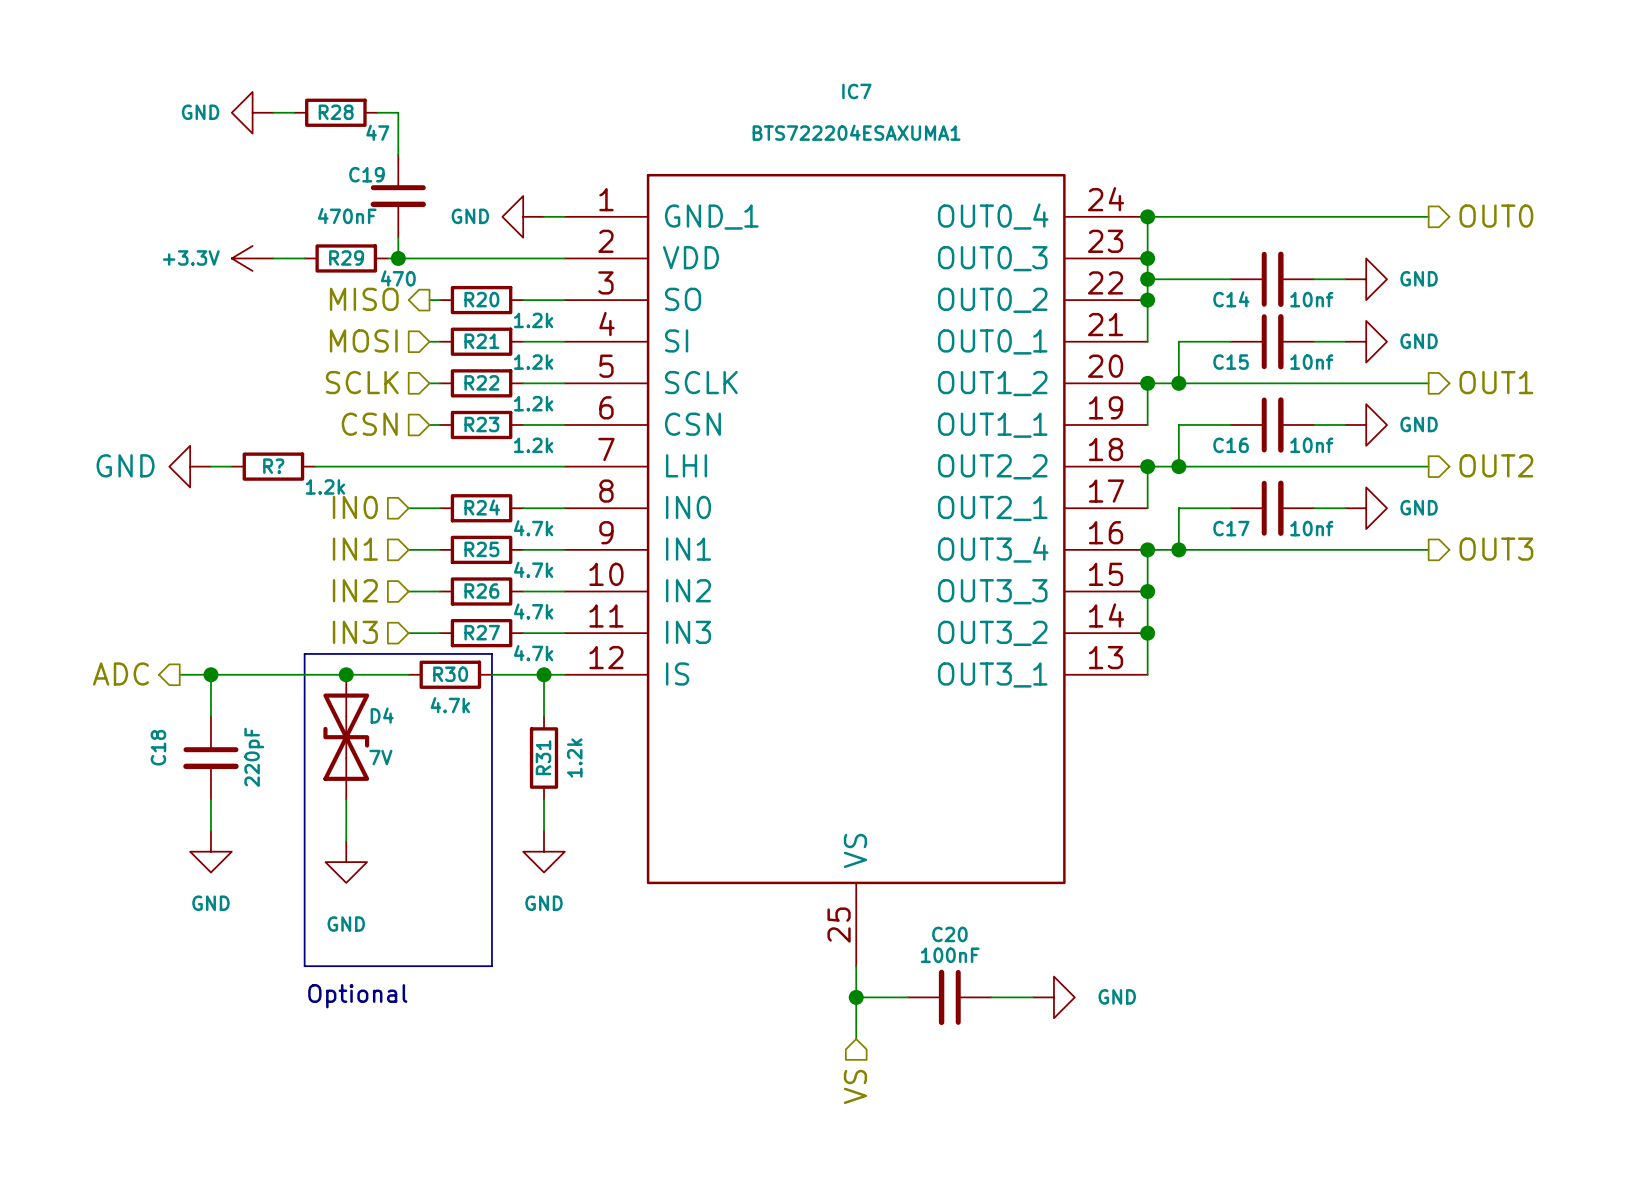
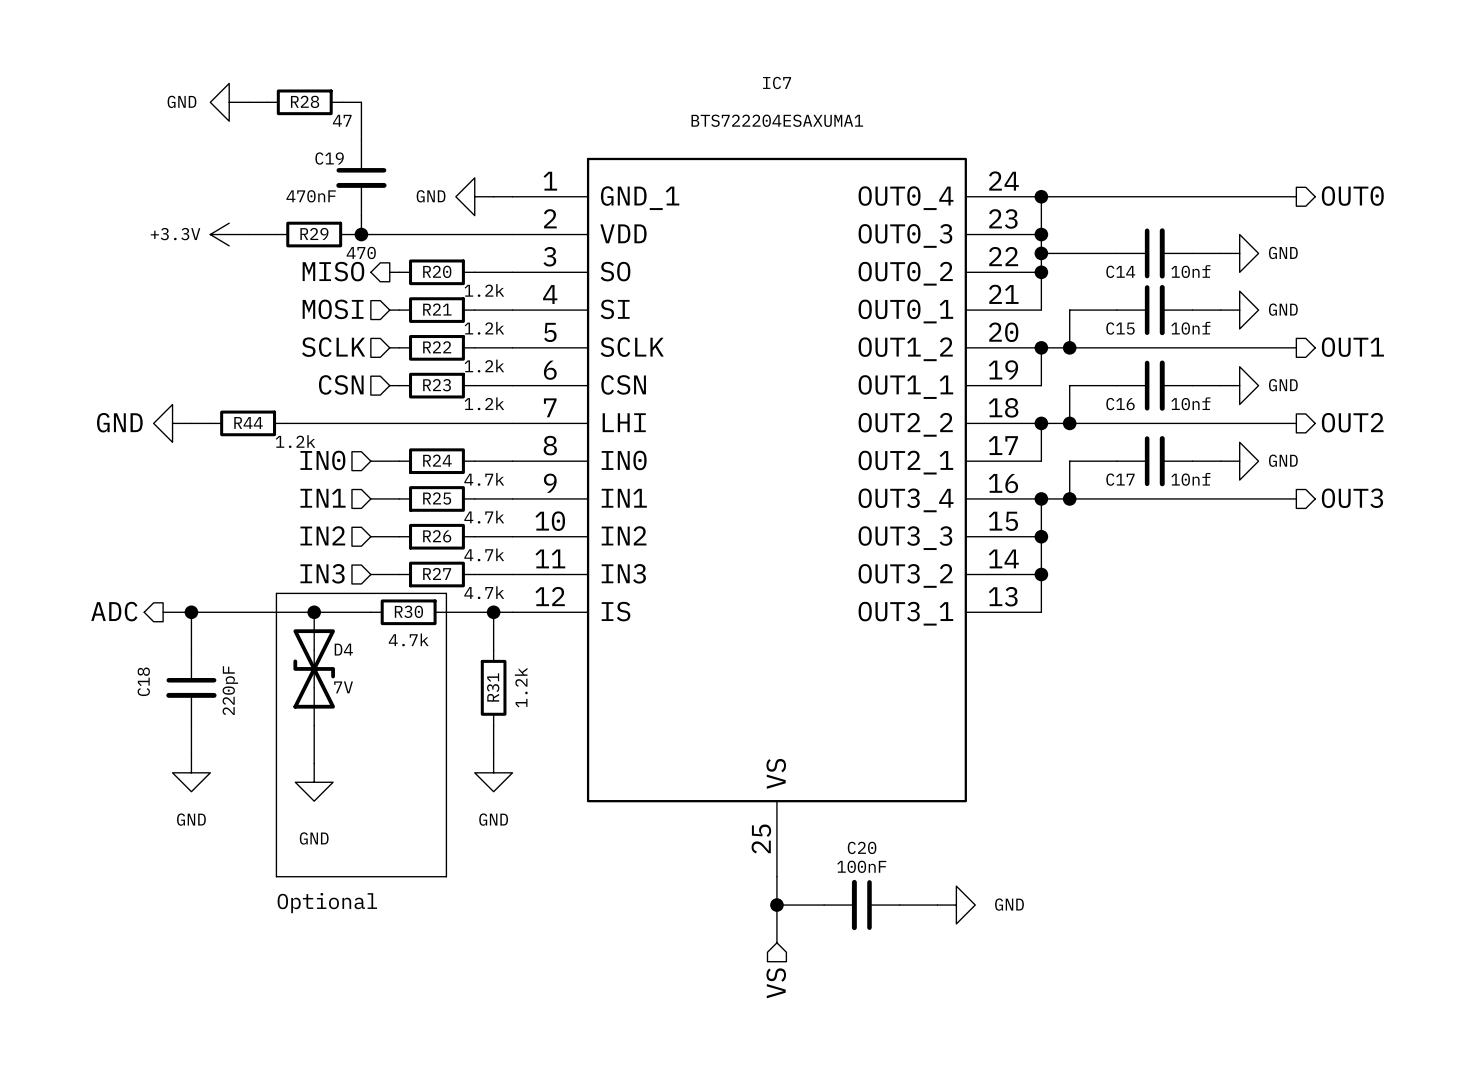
R? name: R? (273, 466) -> R44 (248, 422)

